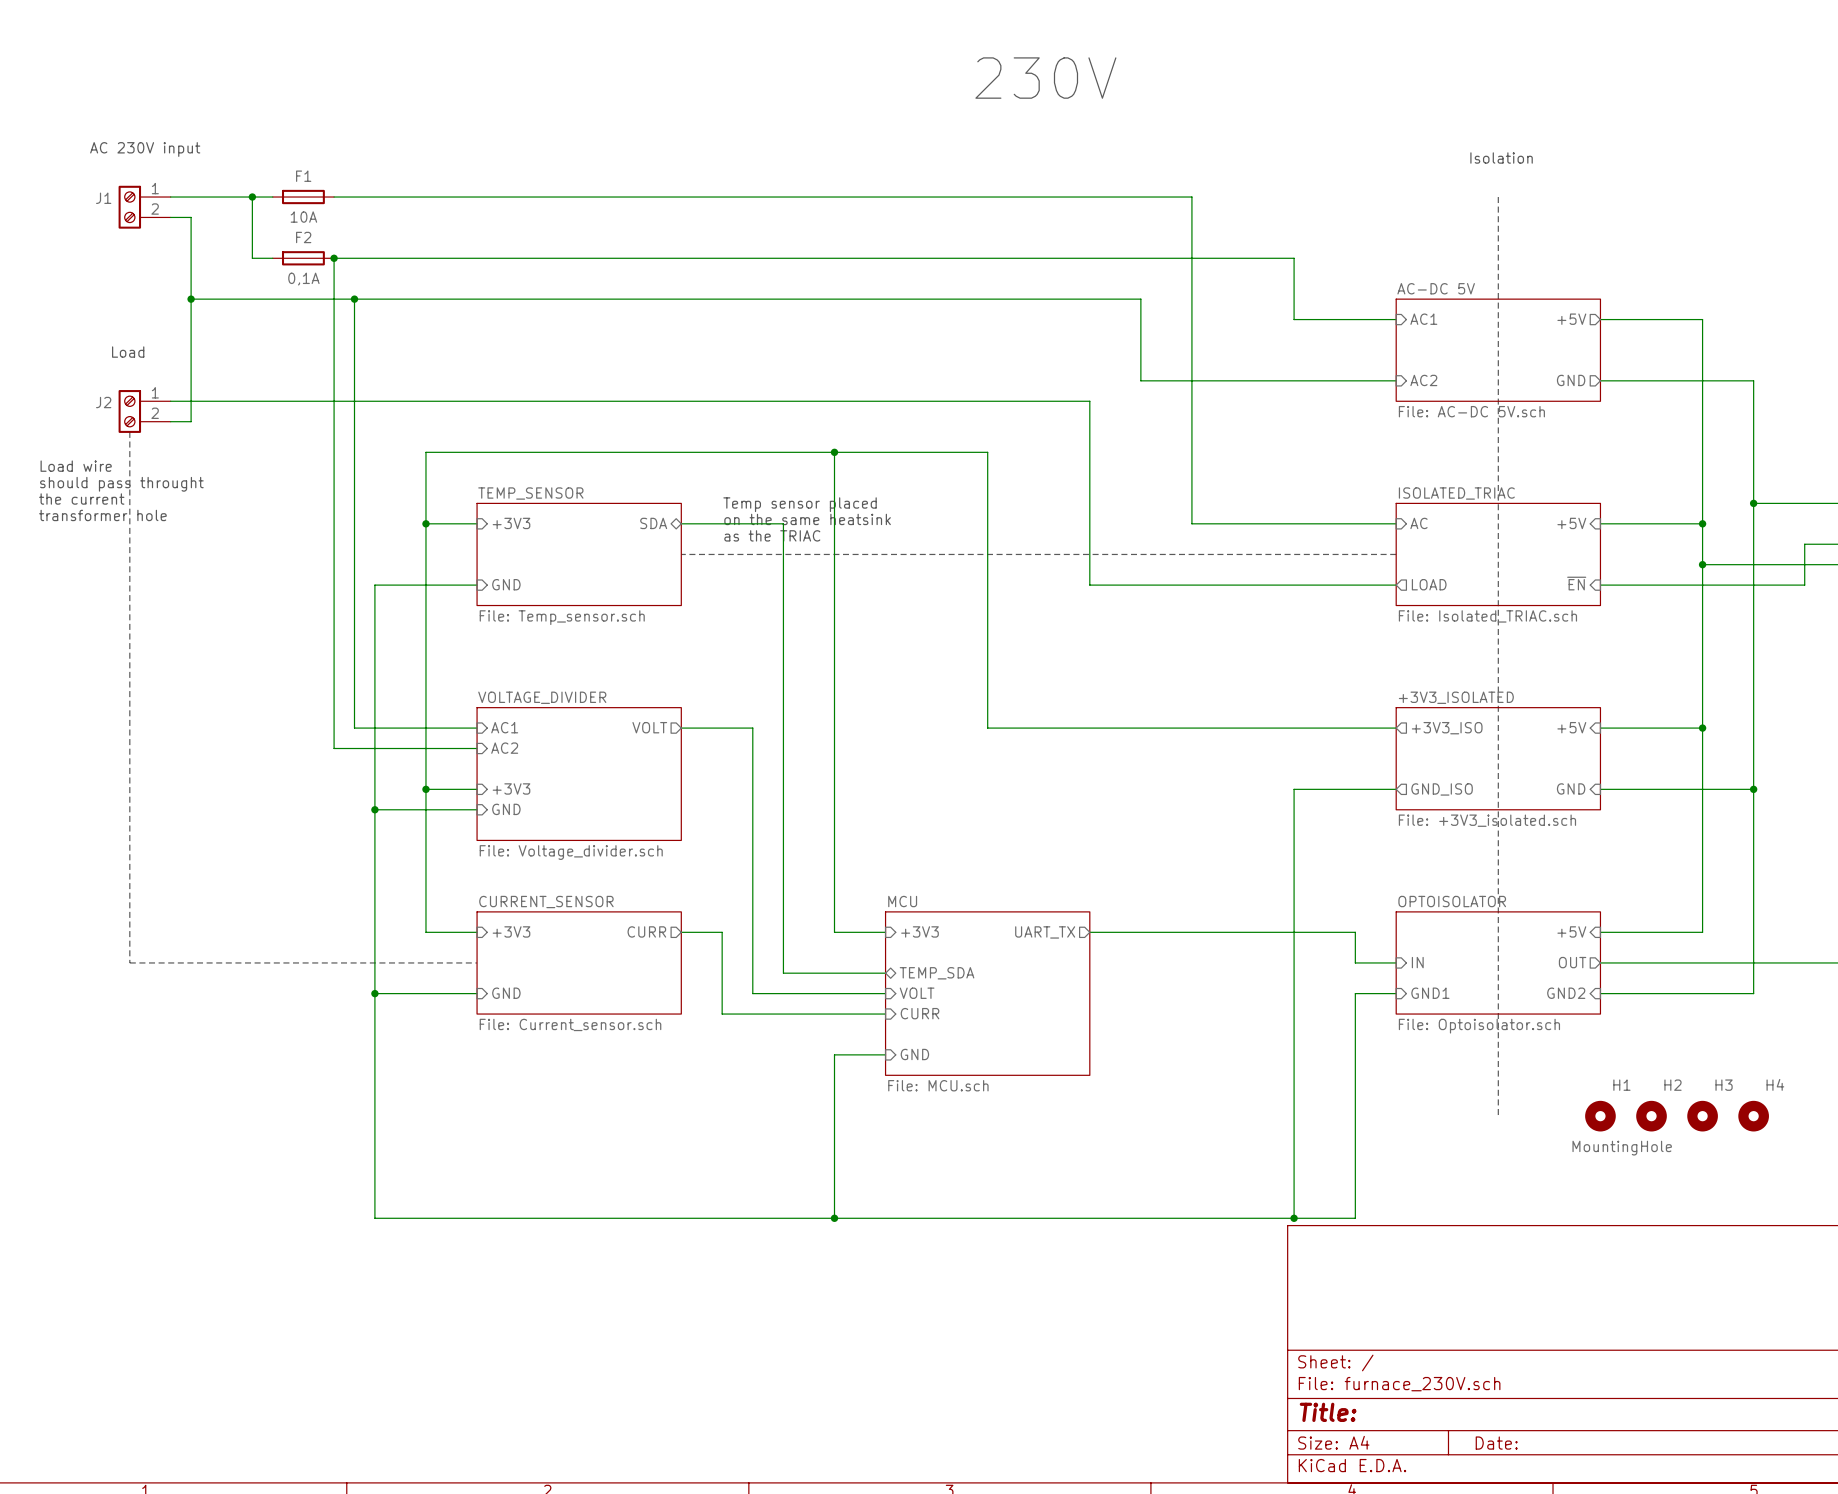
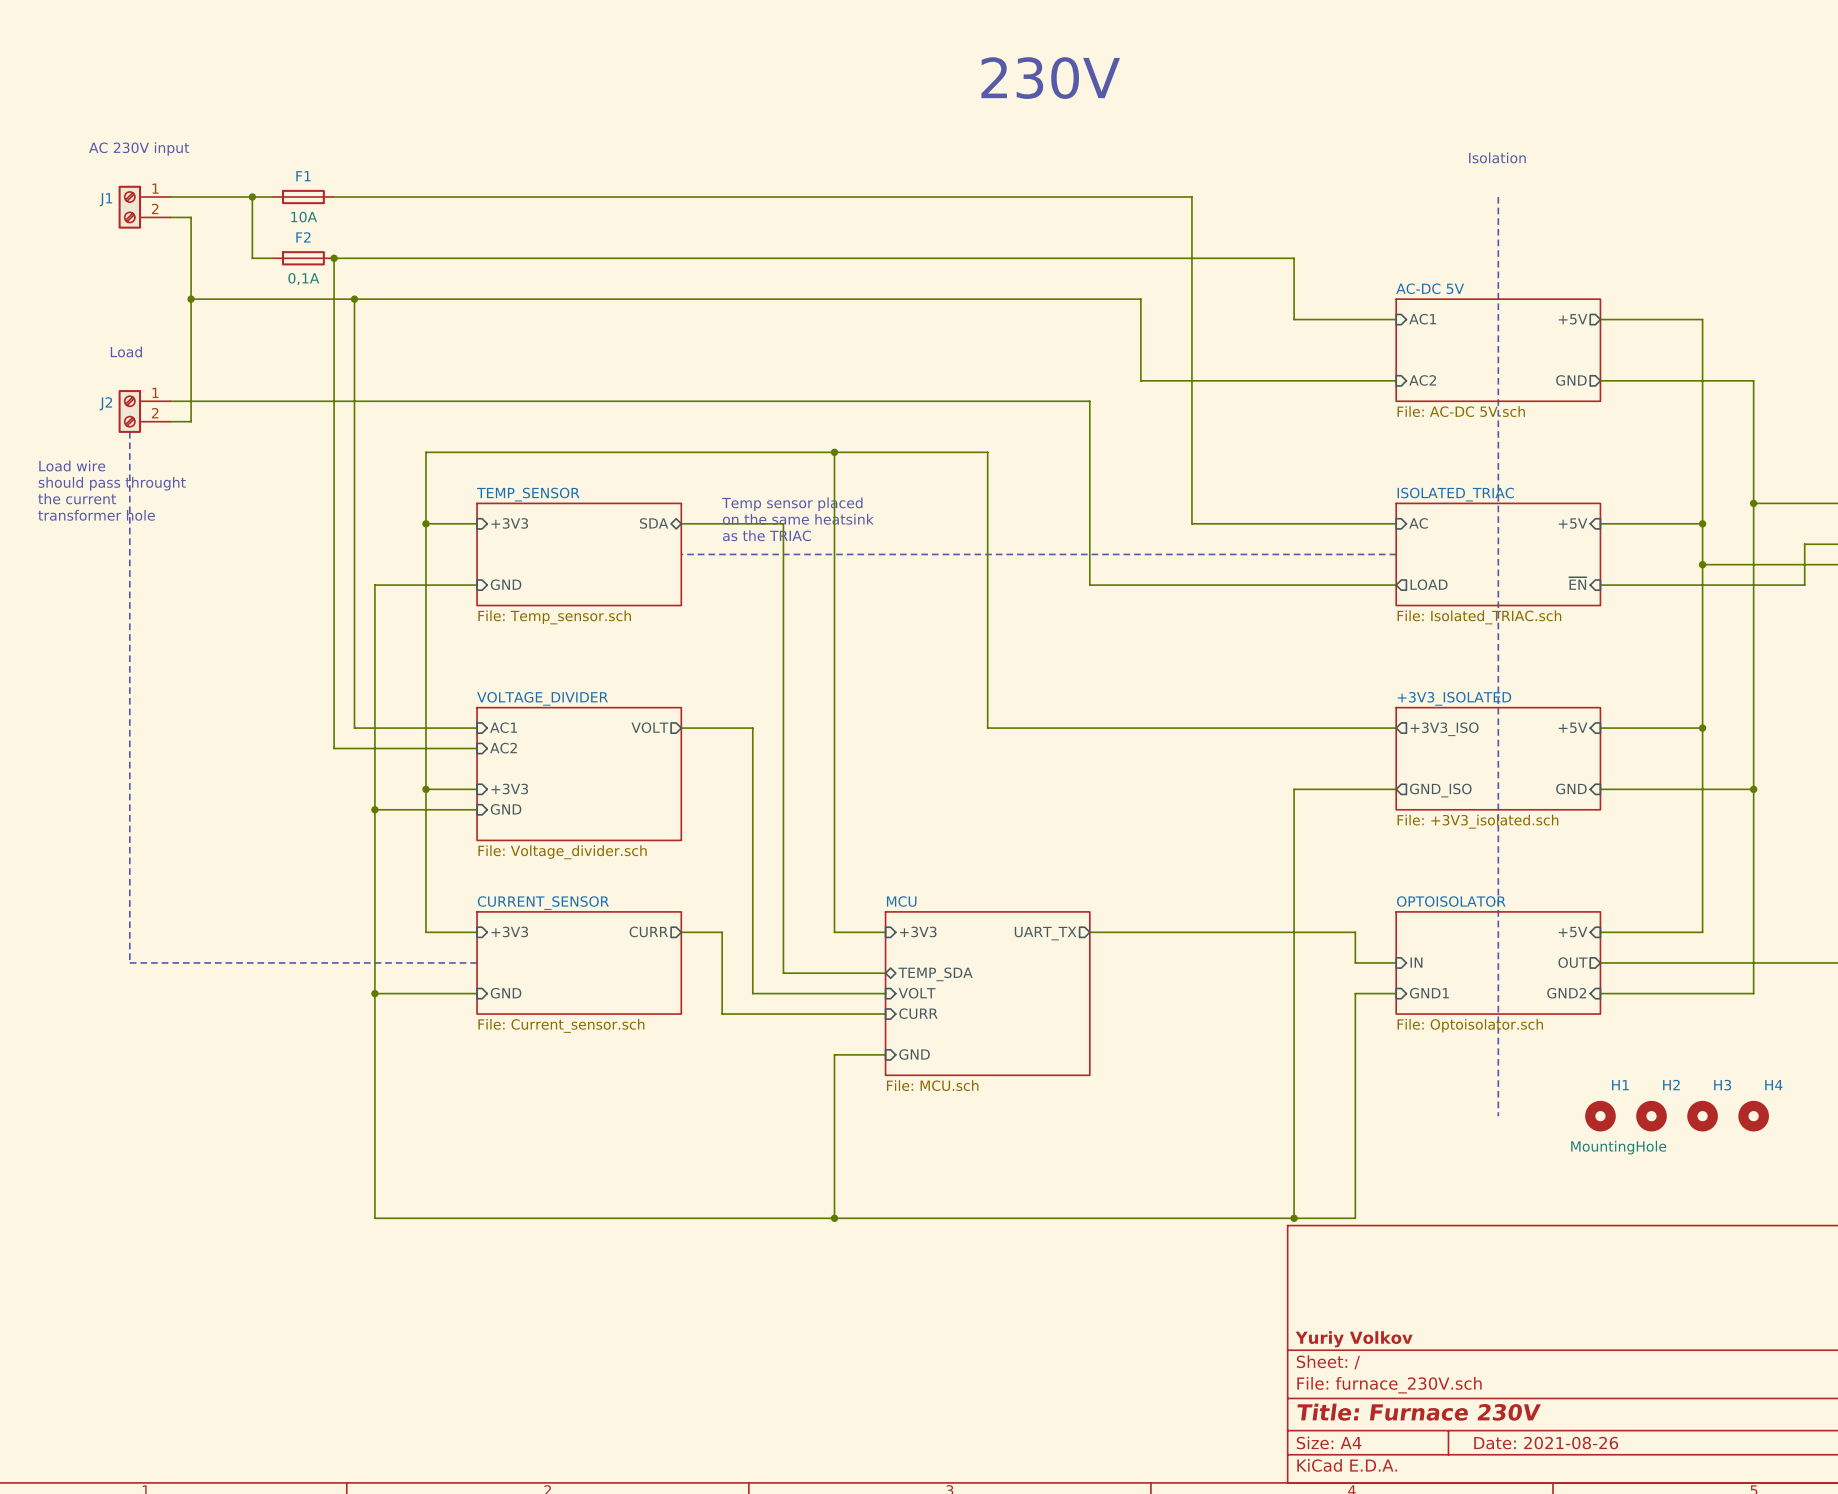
title block: none -> Yuriy Volkov (1354, 1339)
title block: Title: (1328, 1412) -> Title: Furnace 230V (1419, 1412)
title block: Date: (1496, 1443) -> Date: 2021-08-26 (1546, 1443)

